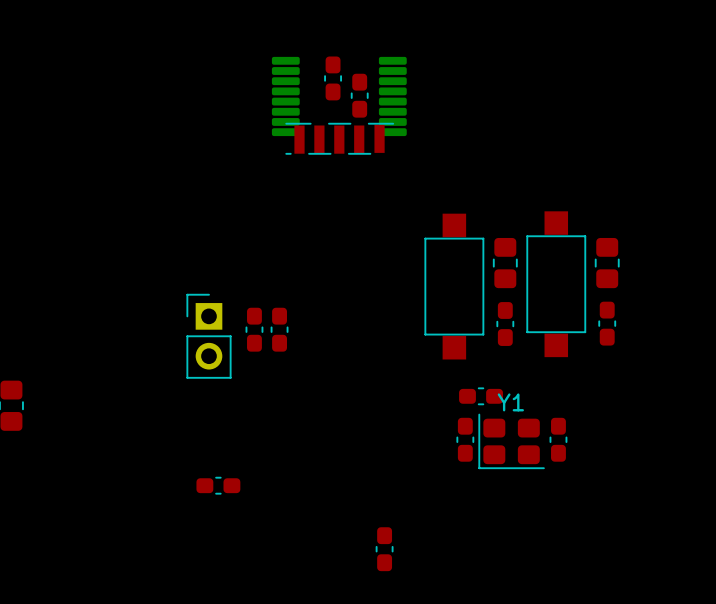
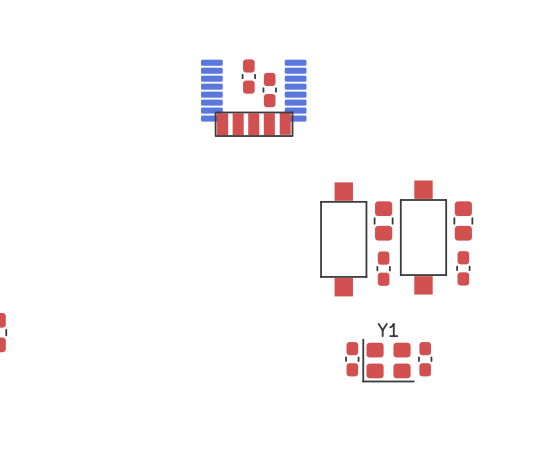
part footprint: [285, 122, 395, 155] -> [214, 111, 294, 137]
part: (254, 329) -> none
part: (279, 329) -> none
part: (208, 336) -> none
part: (481, 396) -> none
part: (218, 485) -> none
part: (384, 549) -> none

